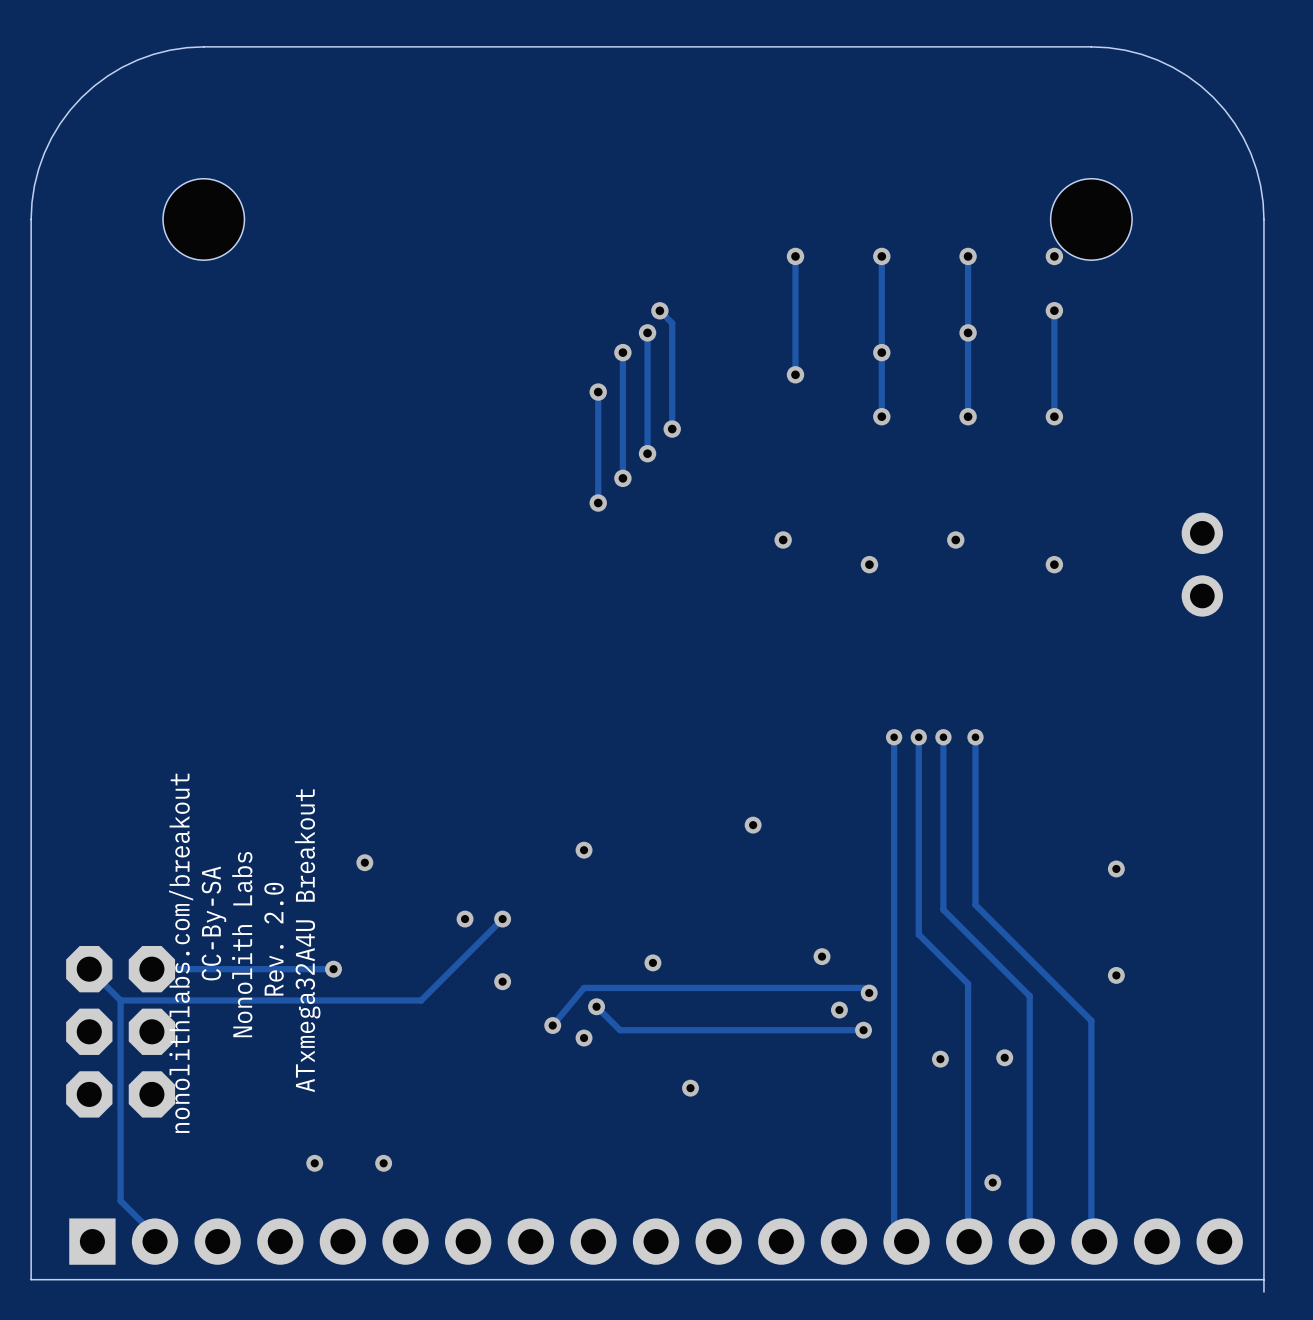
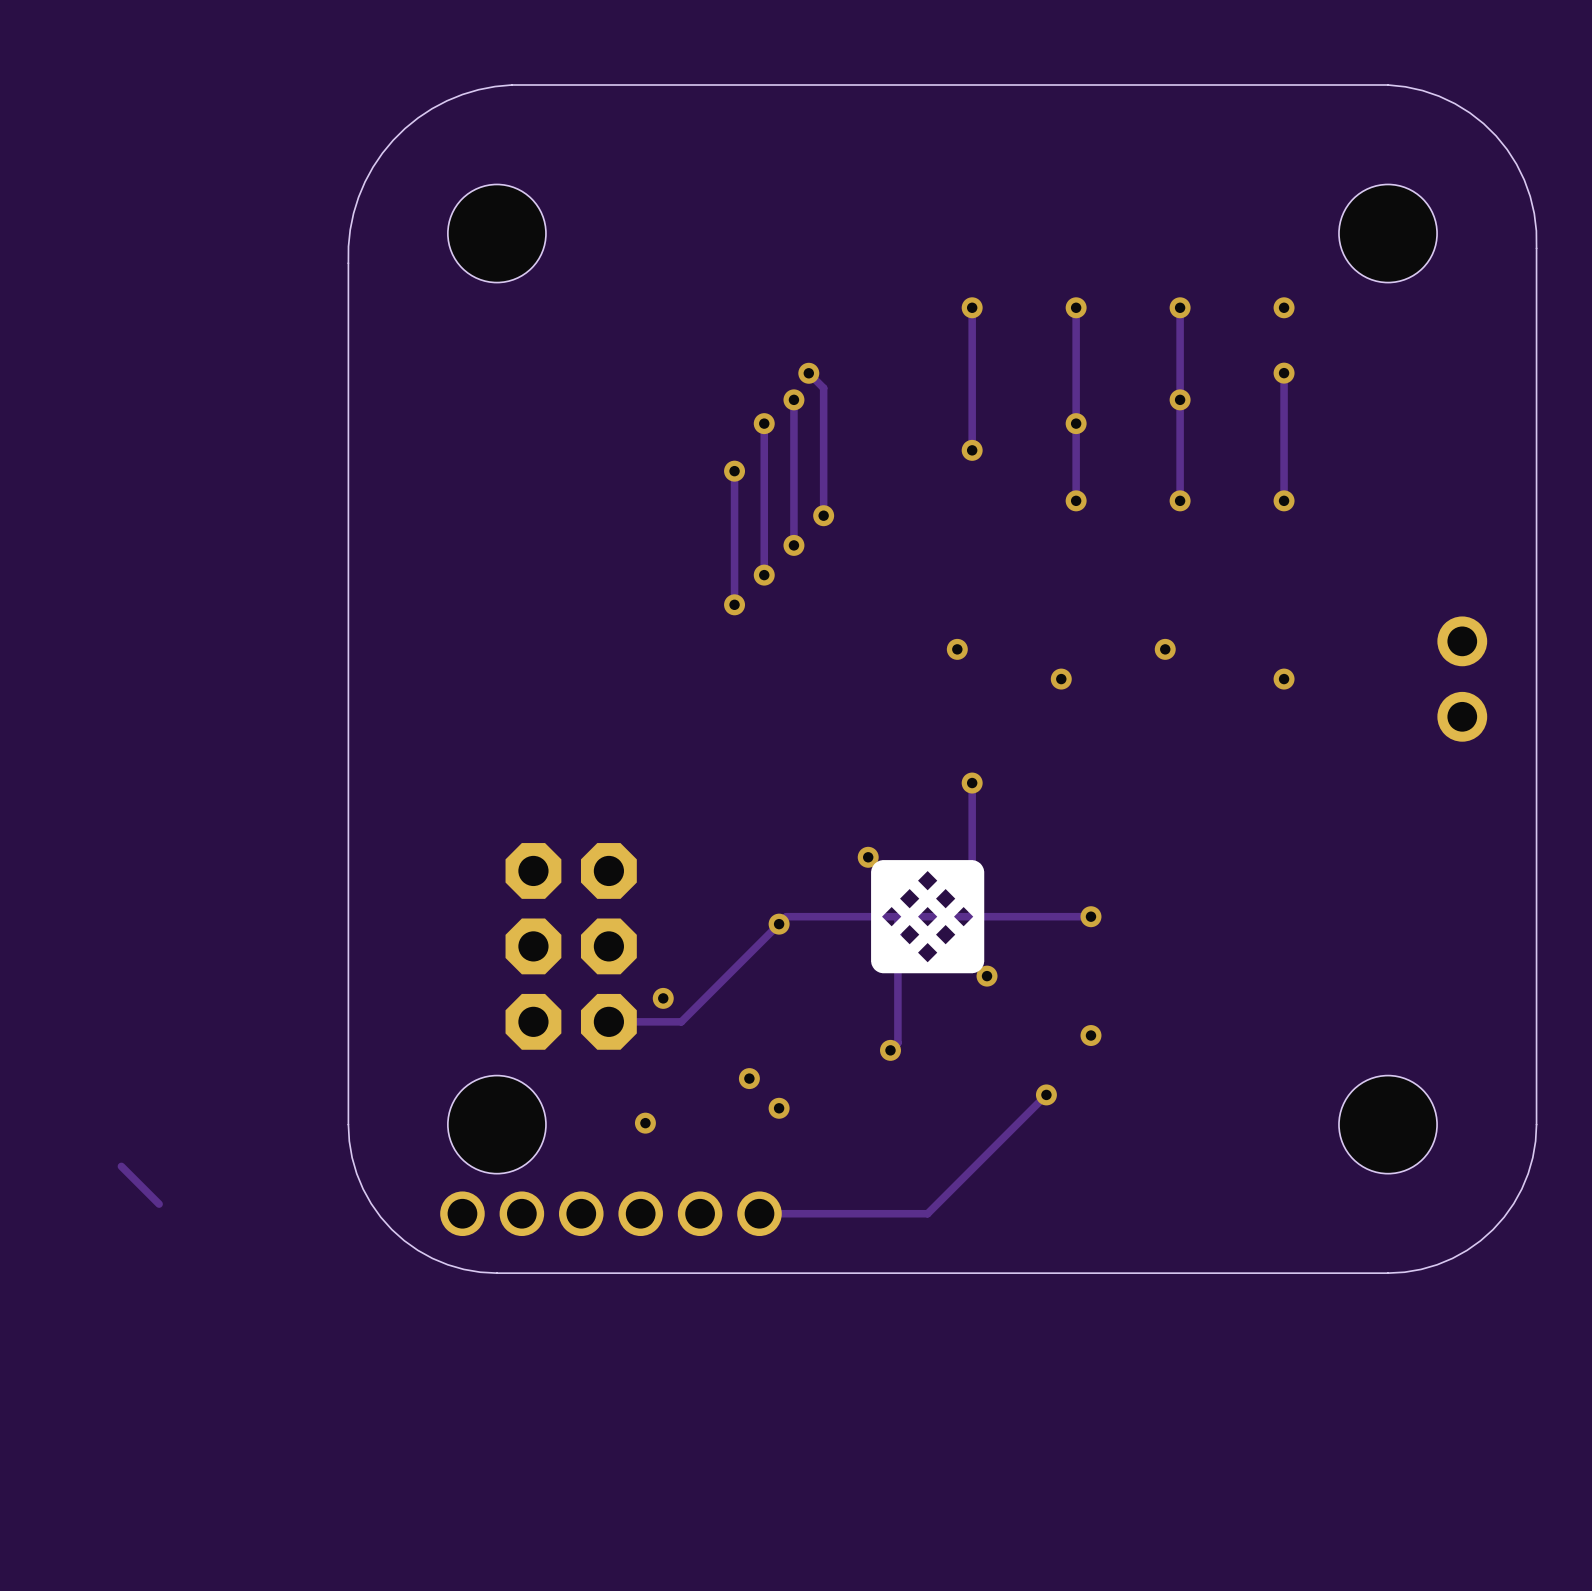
part position: (203, 219) -> (496, 233)
part position: (1091, 219) -> (1388, 233)
board edge: (1263, 219) (1260, 185) (1250, 153) (1234, 123) (1213, 97) (1187, 75) (1157, 60) (1125, 50) (1091, 46) (203, 46) (170, 50) (137, 60) (107, 75) (94, 86) (70, 109) (60, 123) (44, 153) (34, 185) (31, 219) (31, 1279) (1263, 1279) -> (1536, 263) (1536, 230) (1530, 196) (1516, 164) (1496, 135) (1483, 123) (1454, 103) (1422, 90) (1388, 85) (511, 85) (495, 86) (462, 94) (432, 108) (418, 117) (393, 140) (373, 167) (358, 197) (350, 229) (348, 246) (349, 1141) (356, 1173) (371, 1203) (380, 1217) (404, 1240) (417, 1250) (447, 1264) (480, 1272) (496, 1273) (1404, 1272) (1437, 1264) (1467, 1250) (1480, 1240) (1504, 1217) (1513, 1203) (1528, 1173) (1535, 1141) (1536, 1124)
track: none -> (972, 783) (972, 916)
via: none -> (972, 783)
via: none -> (868, 857)
drawing: none -> [871, 860, 985, 974]
track: (894, 737) (894, 1229) (906, 1241) -> none
via: (894, 737) -> none
track: (918, 737) (918, 934) (968, 983) (969, 1241) -> none
via: (918, 737) -> none
track: (943, 737) (943, 909) (1029, 996) (1029, 1239) (1031, 1241) -> none
via: (943, 737) -> none
track: (975, 737) (975, 904) (1091, 1020) (1091, 1238) (1094, 1241) -> none
via: (975, 737) -> none
track: none -> (897, 916) (897, 1042) (890, 1050)
track: none -> (1090, 916) (786, 916) (681, 1021) (608, 1021)
via: none -> (1090, 916)
via: none -> (779, 924)
via: none -> (987, 976)
via: (753, 825) -> none
via: none -> (663, 998)
via: (584, 850) -> none
via: none -> (1090, 1035)
via: (364, 862) -> none
via: (1116, 868) -> none
via: none -> (890, 1050)
via: none -> (749, 1078)
track: none -> (1046, 1094) (927, 1213) (759, 1213)
via: none -> (1046, 1094)
via: (465, 919) -> none
track: (502, 919) (421, 1000) (120, 1000) (120, 1200) (155, 1235) (155, 1241) -> none
via: (502, 919) -> none
via: none -> (779, 1108)
text: CC-By-SA (213, 923) -> none
via: none -> (645, 1123)
part: none -> (496, 1124)
part: none -> (1388, 1124)
board edge: (1263, 934) (1263, 1292) -> none
text: Rev. 2.0 (274, 939) -> none
text: ATxmega32A4U Breakout (307, 940) -> none
text: Nonolith Labs (242, 944) -> none
text: nonolithlabs.com/breakout (181, 953) -> none
via: (822, 956) -> none
via: (652, 962) -> none
track: (333, 969) (151, 969) -> none
via: (333, 969) -> none
via: (1116, 975) -> none
via: (502, 981) -> none
track: (869, 993) (864, 987) (584, 987) (552, 1025) -> none
via: (869, 993) -> none
track: (596, 1006) (620, 1030) (863, 1030) -> none
via: (596, 1006) -> none
part: none -> (610, 1213)
via: (839, 1010) -> none
via: (552, 1025) -> none
via: (863, 1030) -> none
part position: (120, 1031) -> (571, 946)
via: (584, 1038) -> none
via: (1004, 1057) -> none
via: (940, 1059) -> none
via: (690, 1088) -> none
via: (314, 1163) -> none
via: (383, 1163) -> none
via: (992, 1182) -> none
part: (656, 1241) -> none

